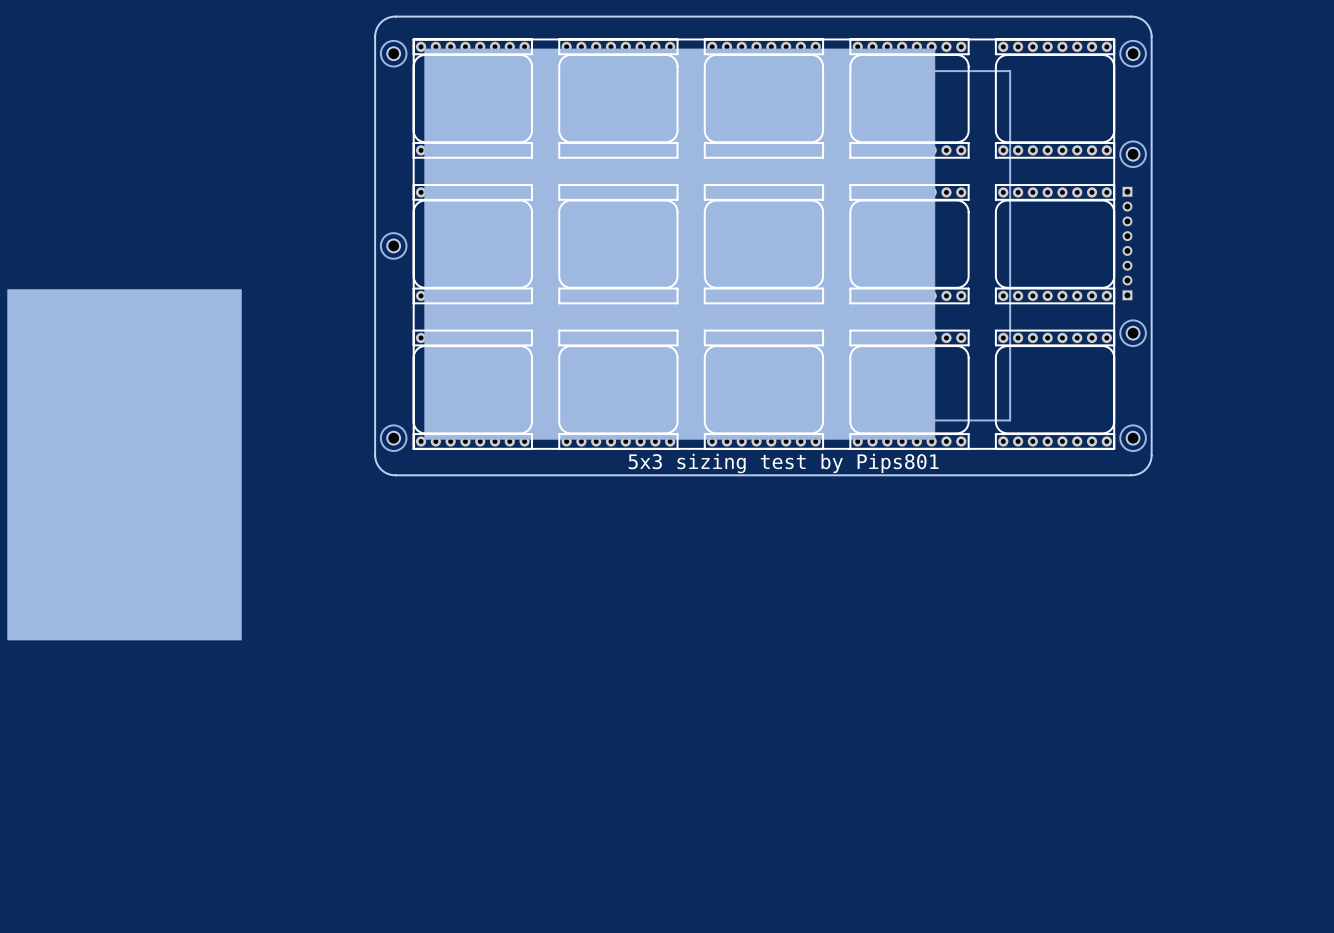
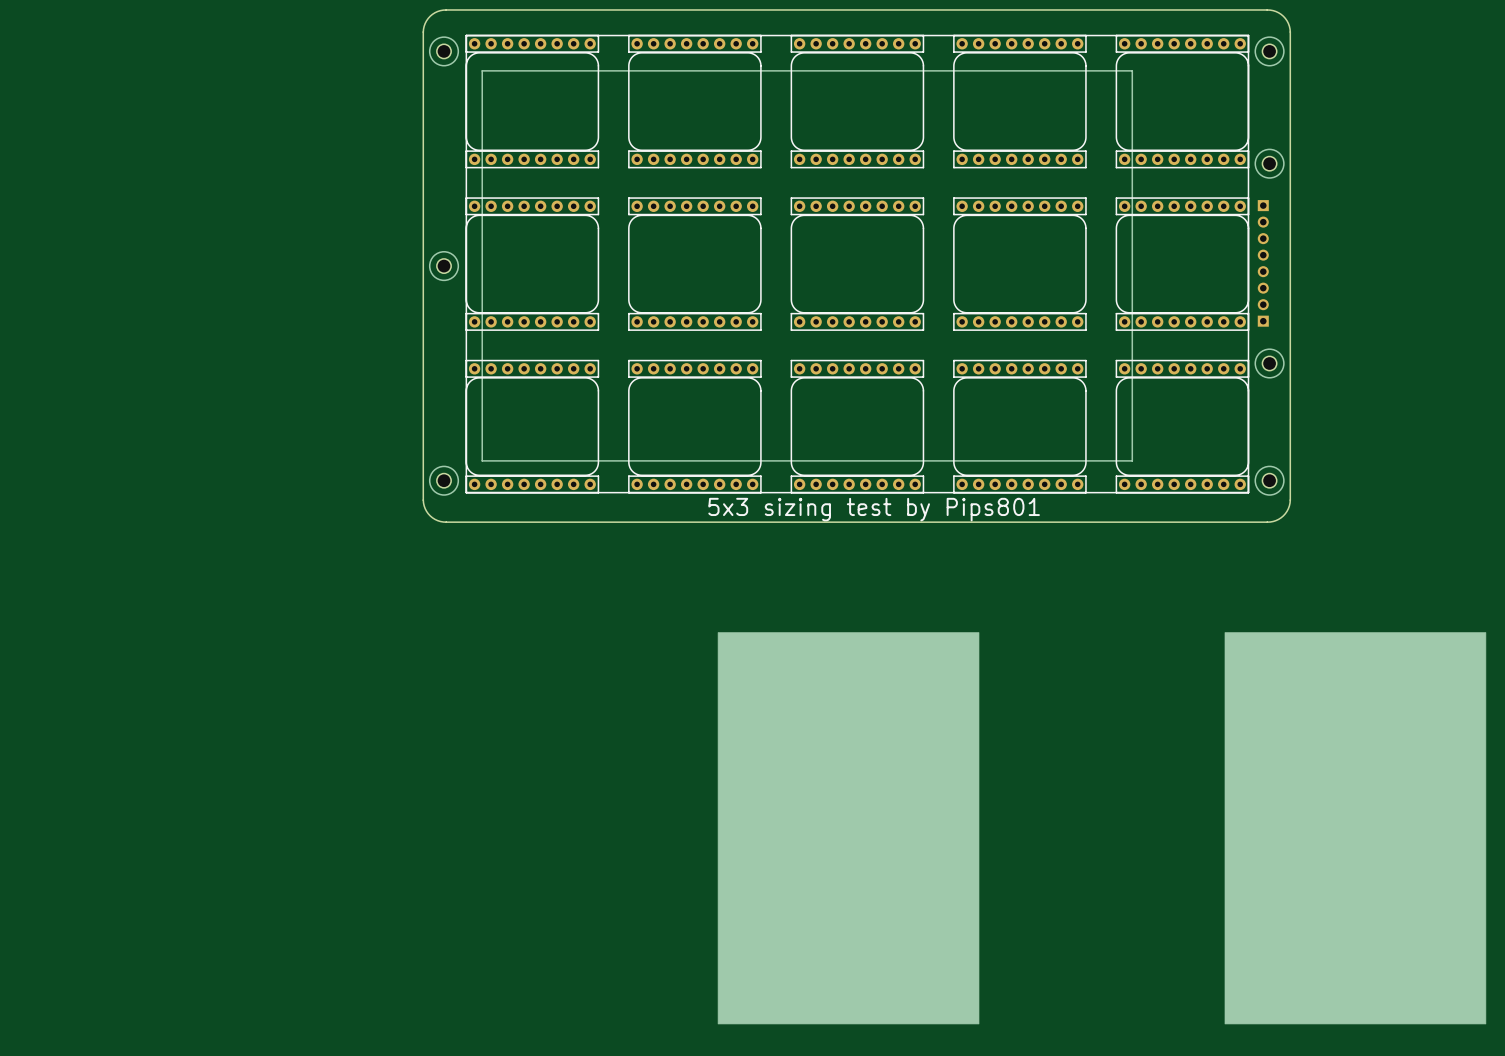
drawing: [424, 48, 936, 440] -> none
drawing: [7, 289, 242, 641] -> none
drawing: none -> [717, 632, 980, 1025]
drawing: none -> [1224, 632, 1487, 1025]

